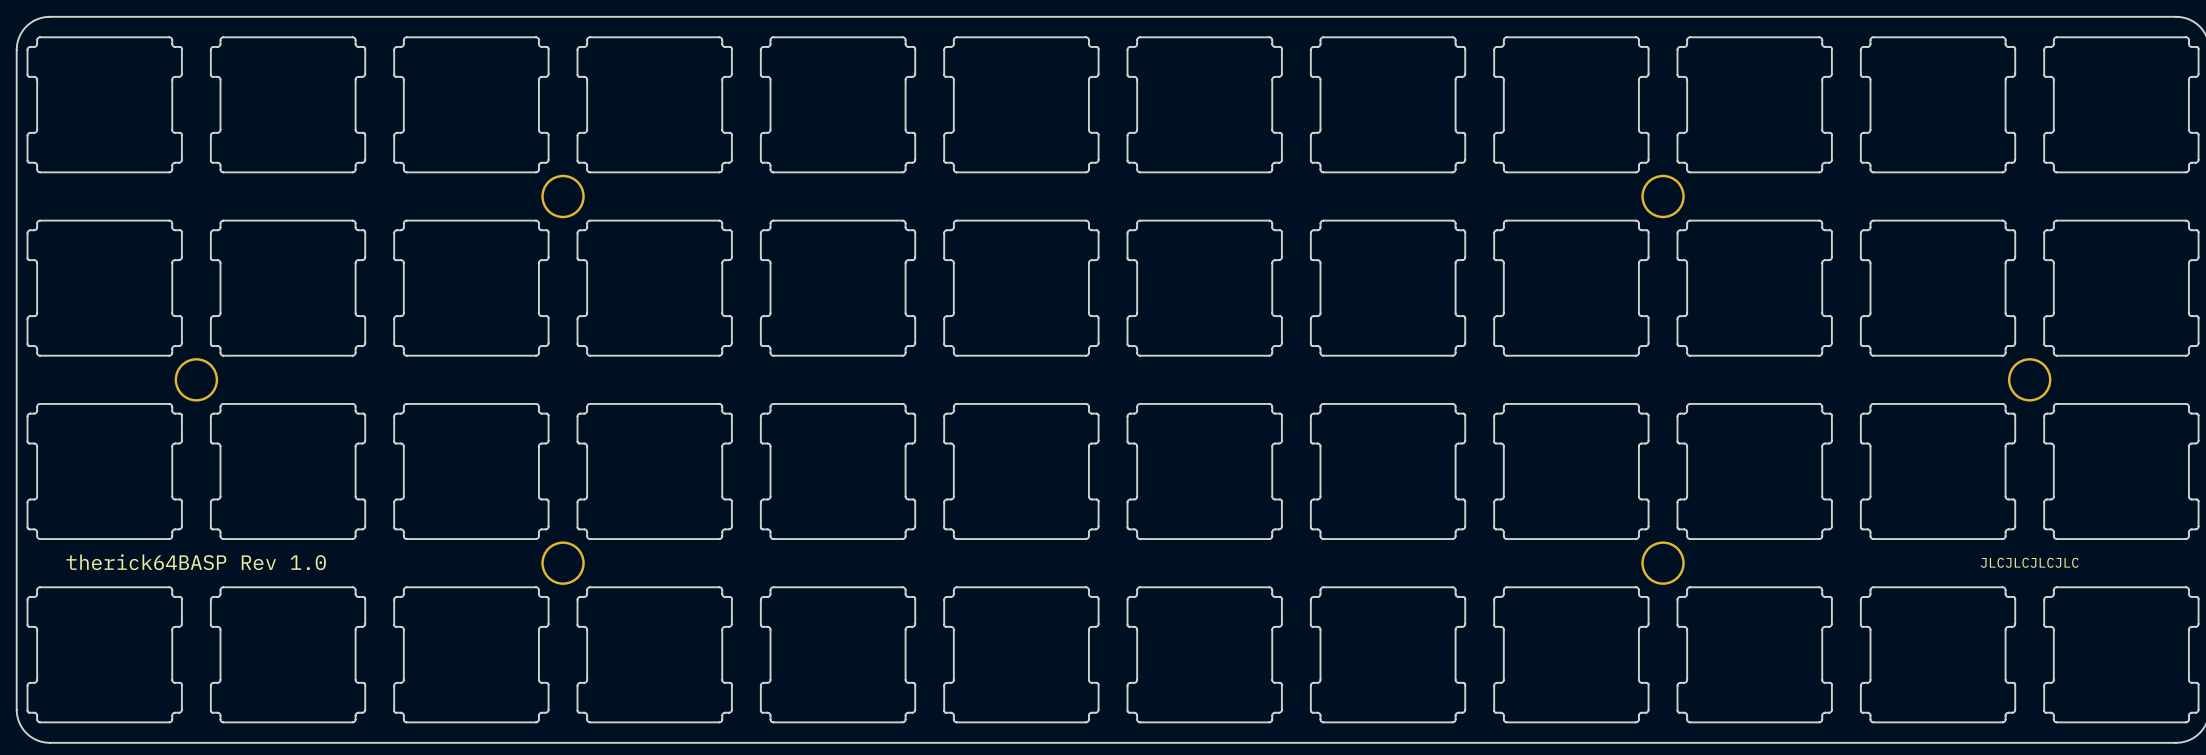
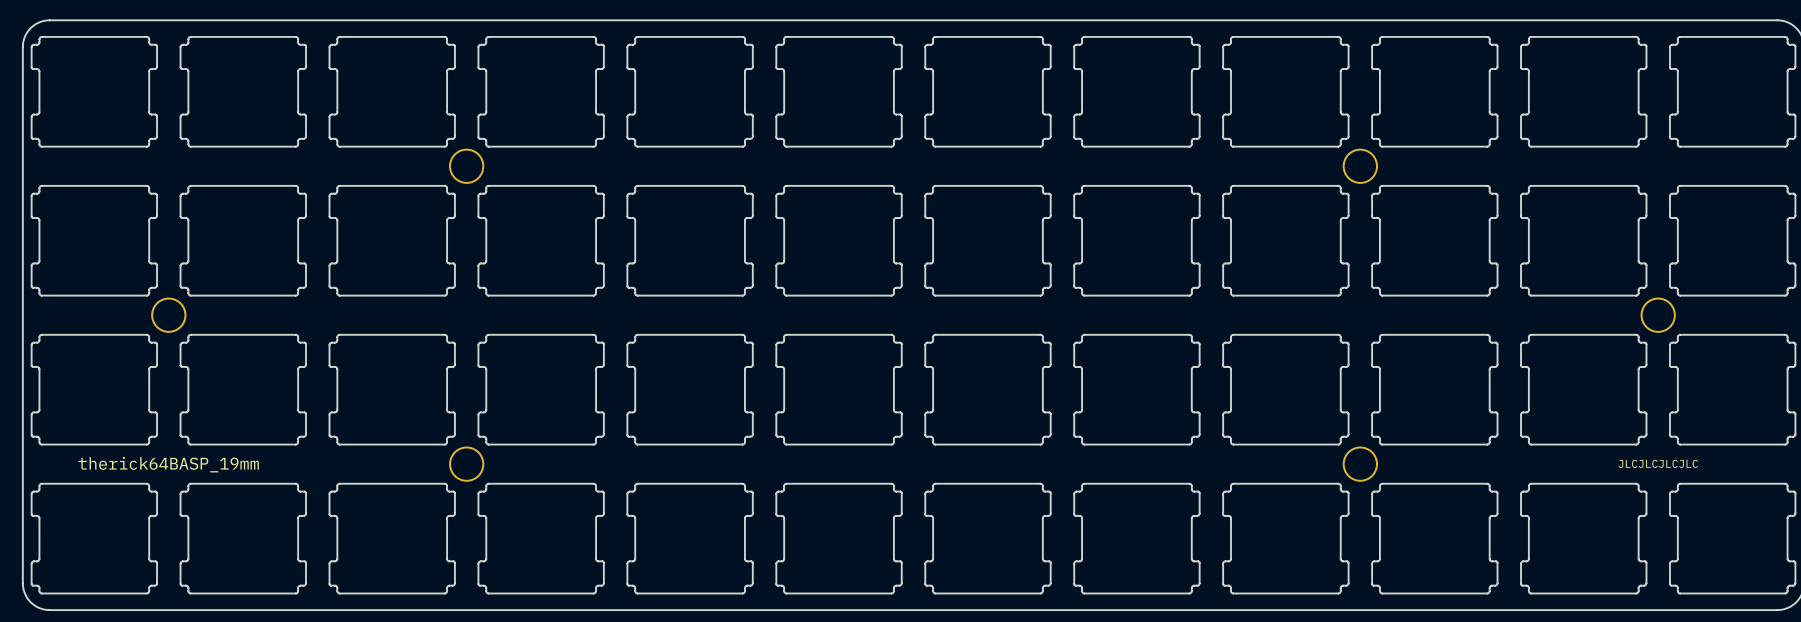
text: therick64BASP Rev 1.0 (196, 562) -> therick64BASP_19mm (168, 464)

